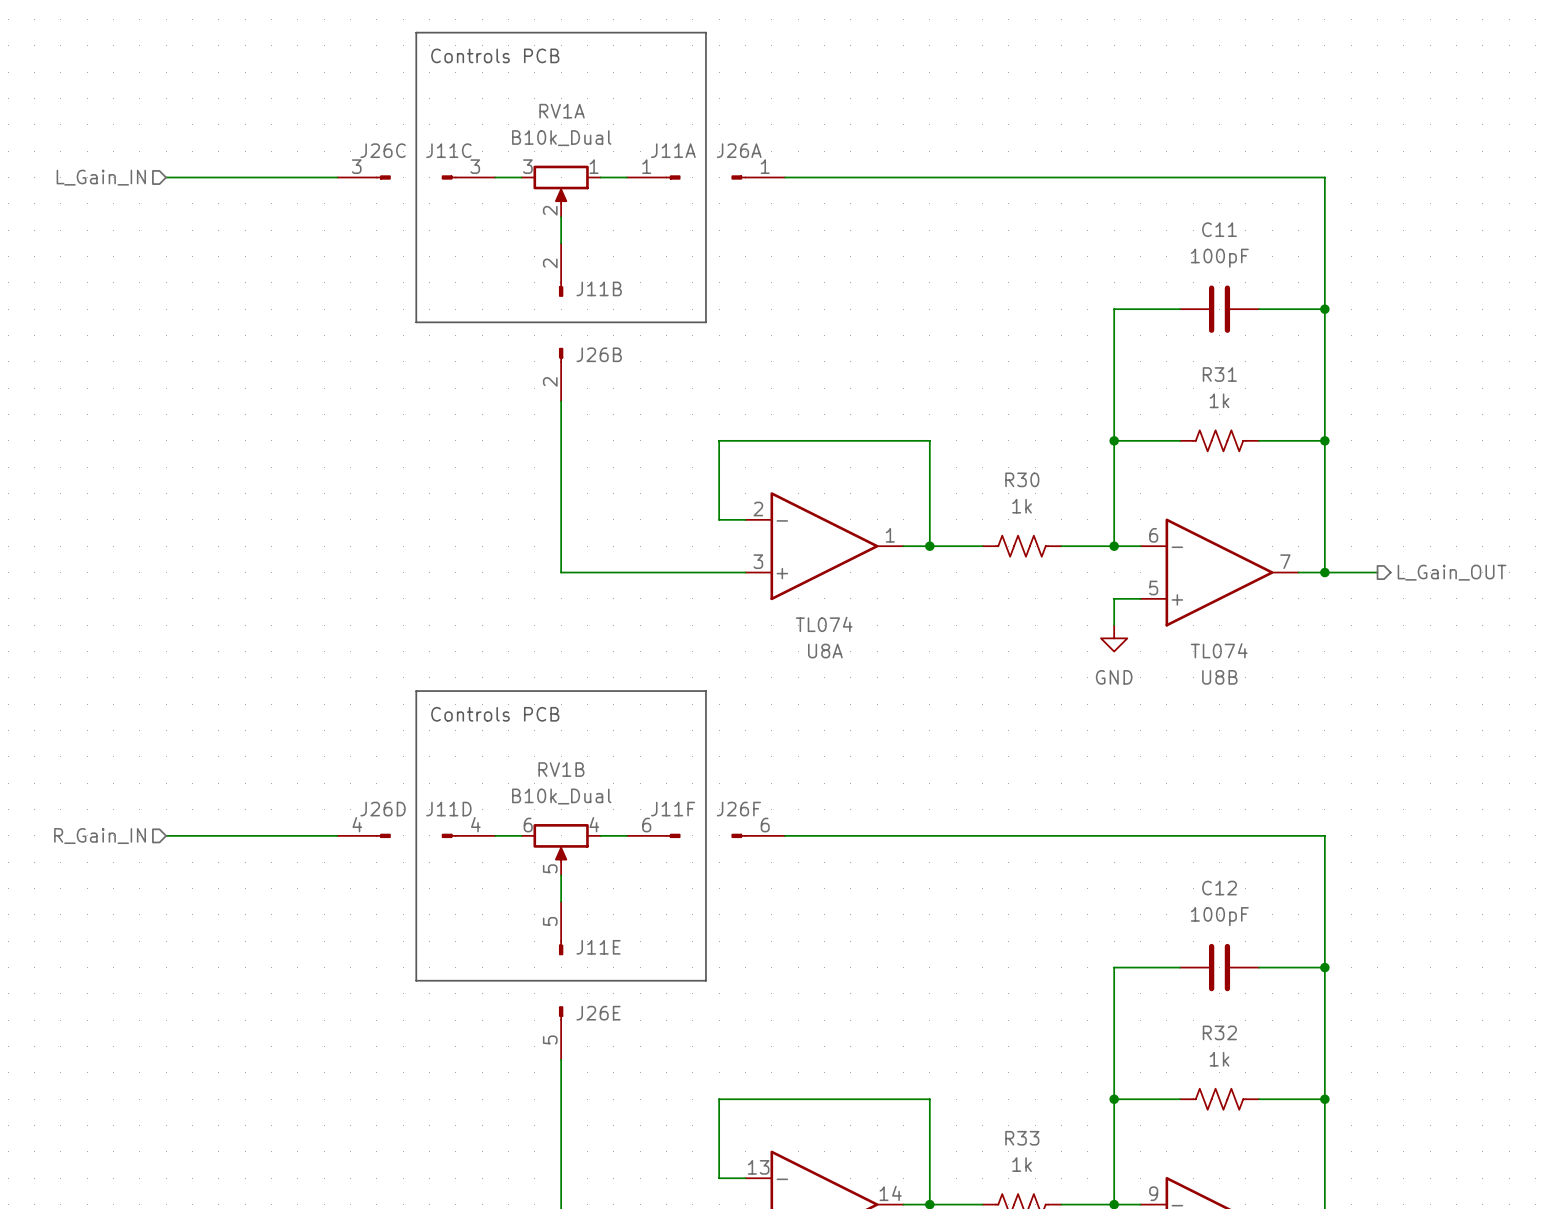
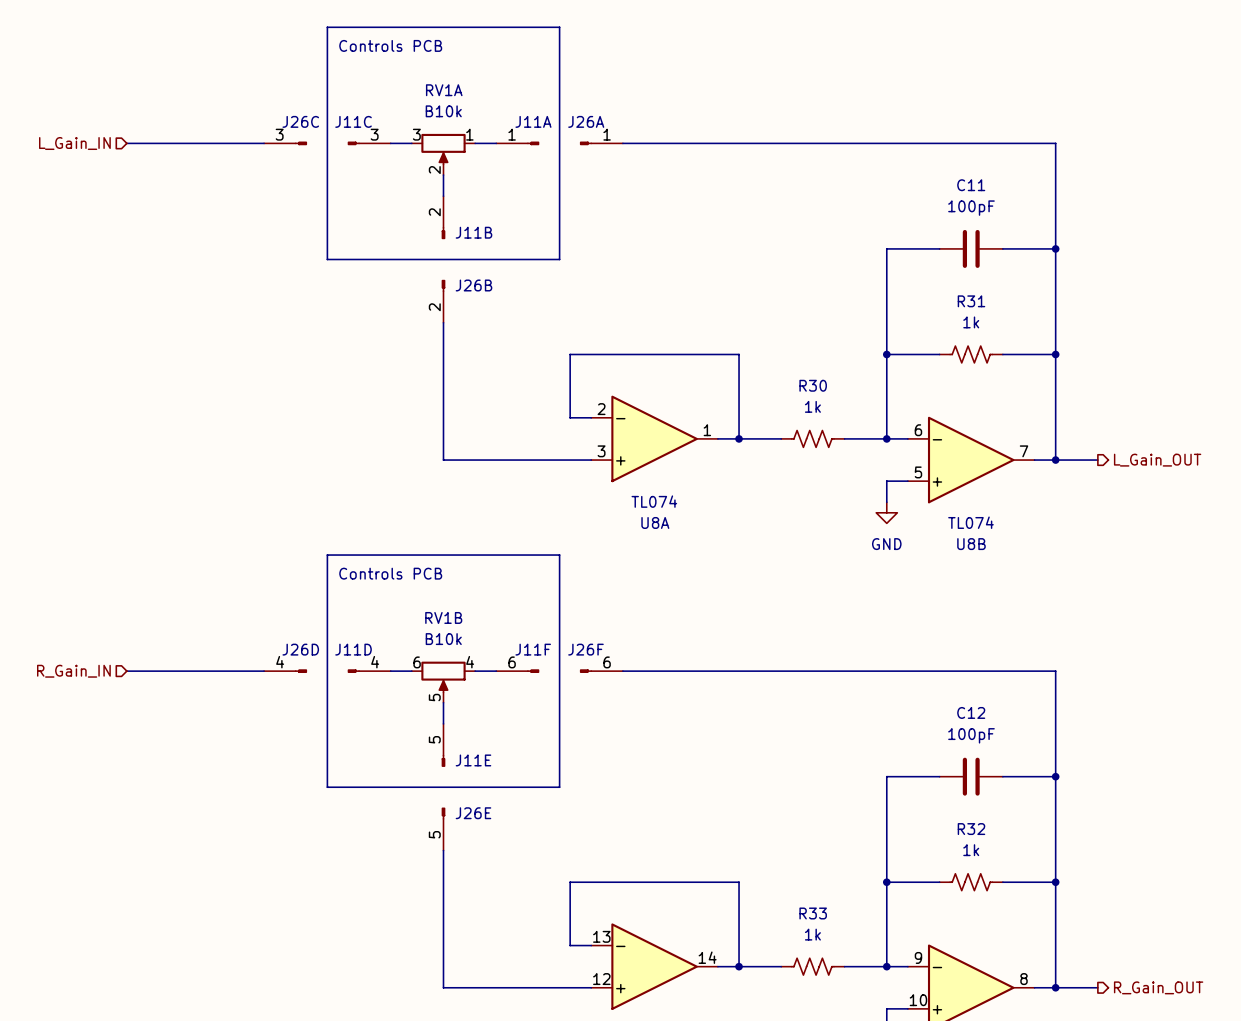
RV1A value: B10k_Dual (561, 138) -> B10k (443, 111)
RV1B value: B10k_Dual (561, 796) -> B10k (443, 639)

